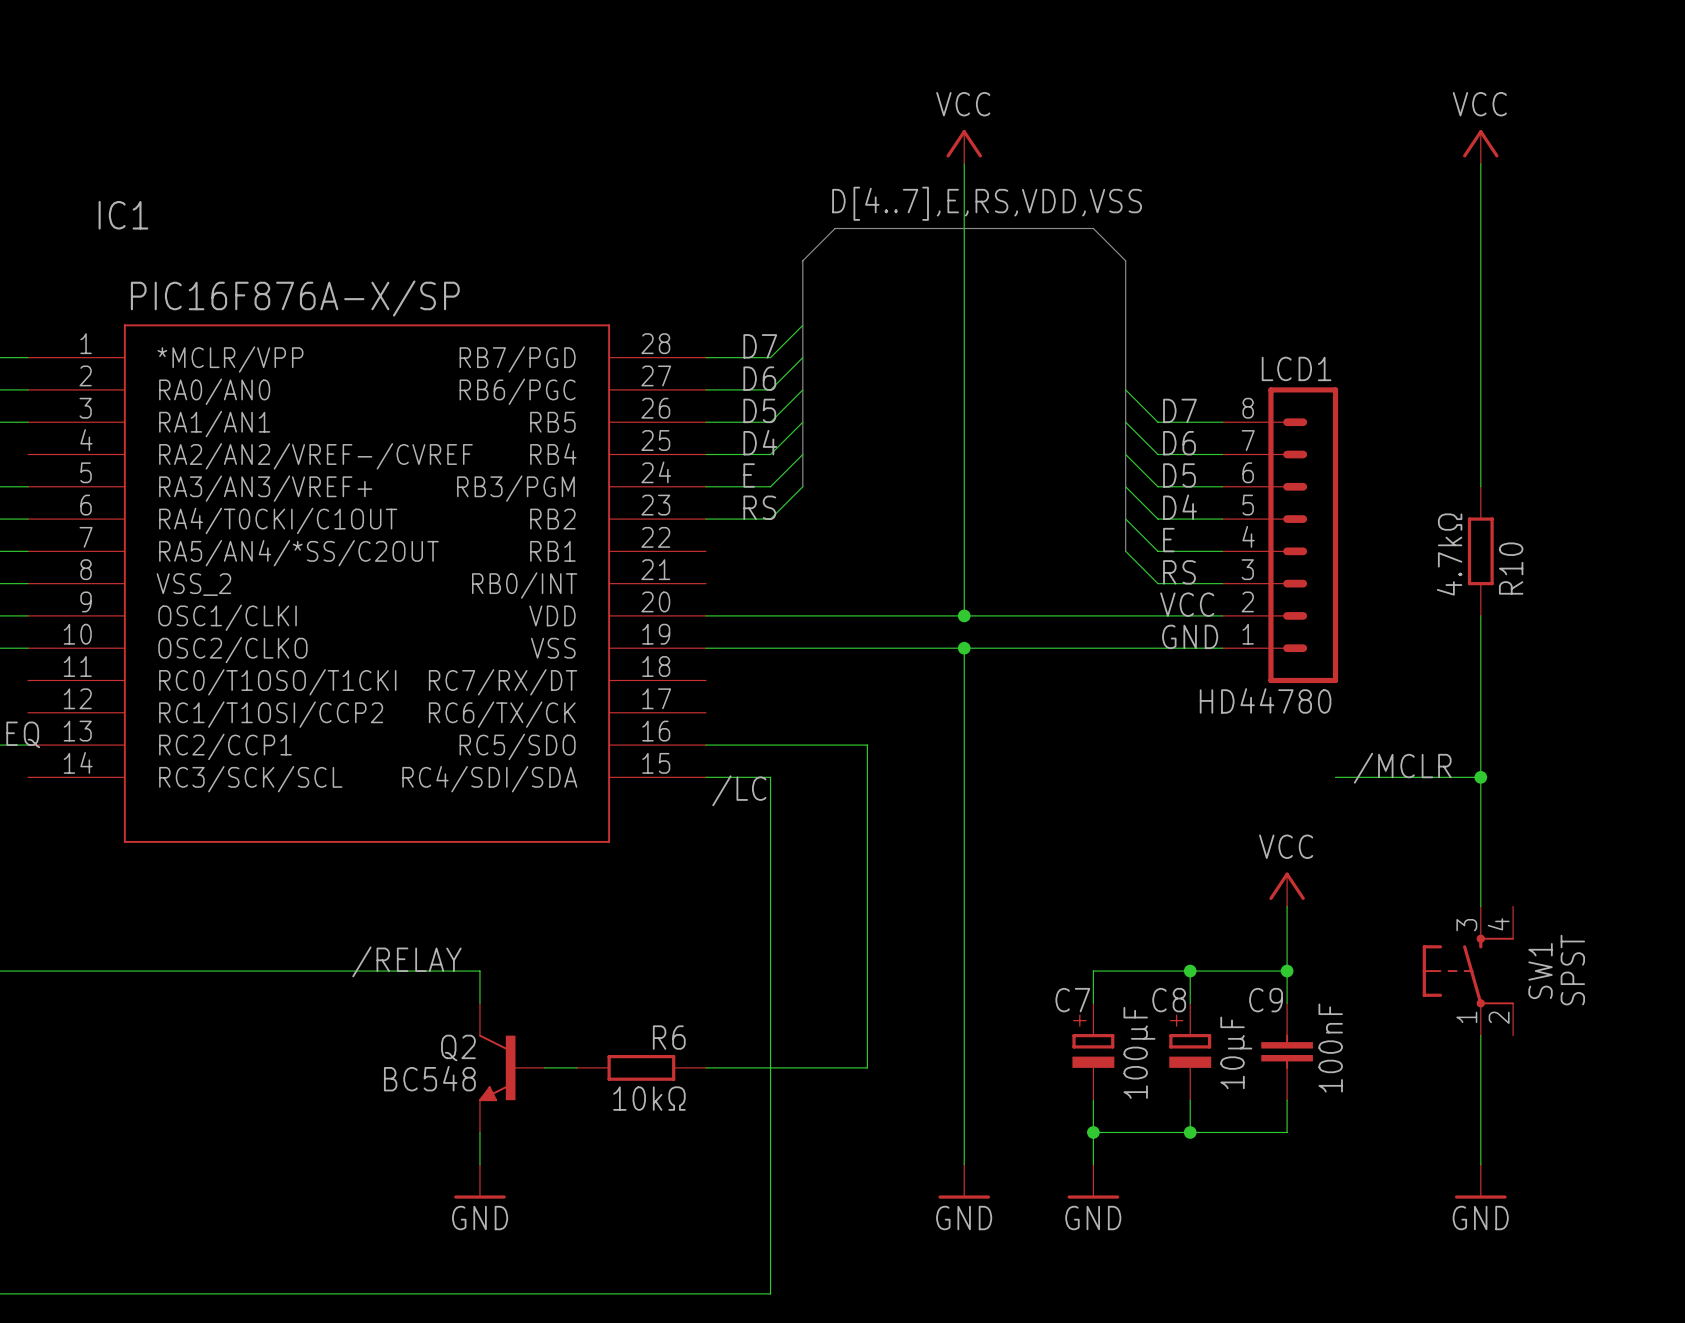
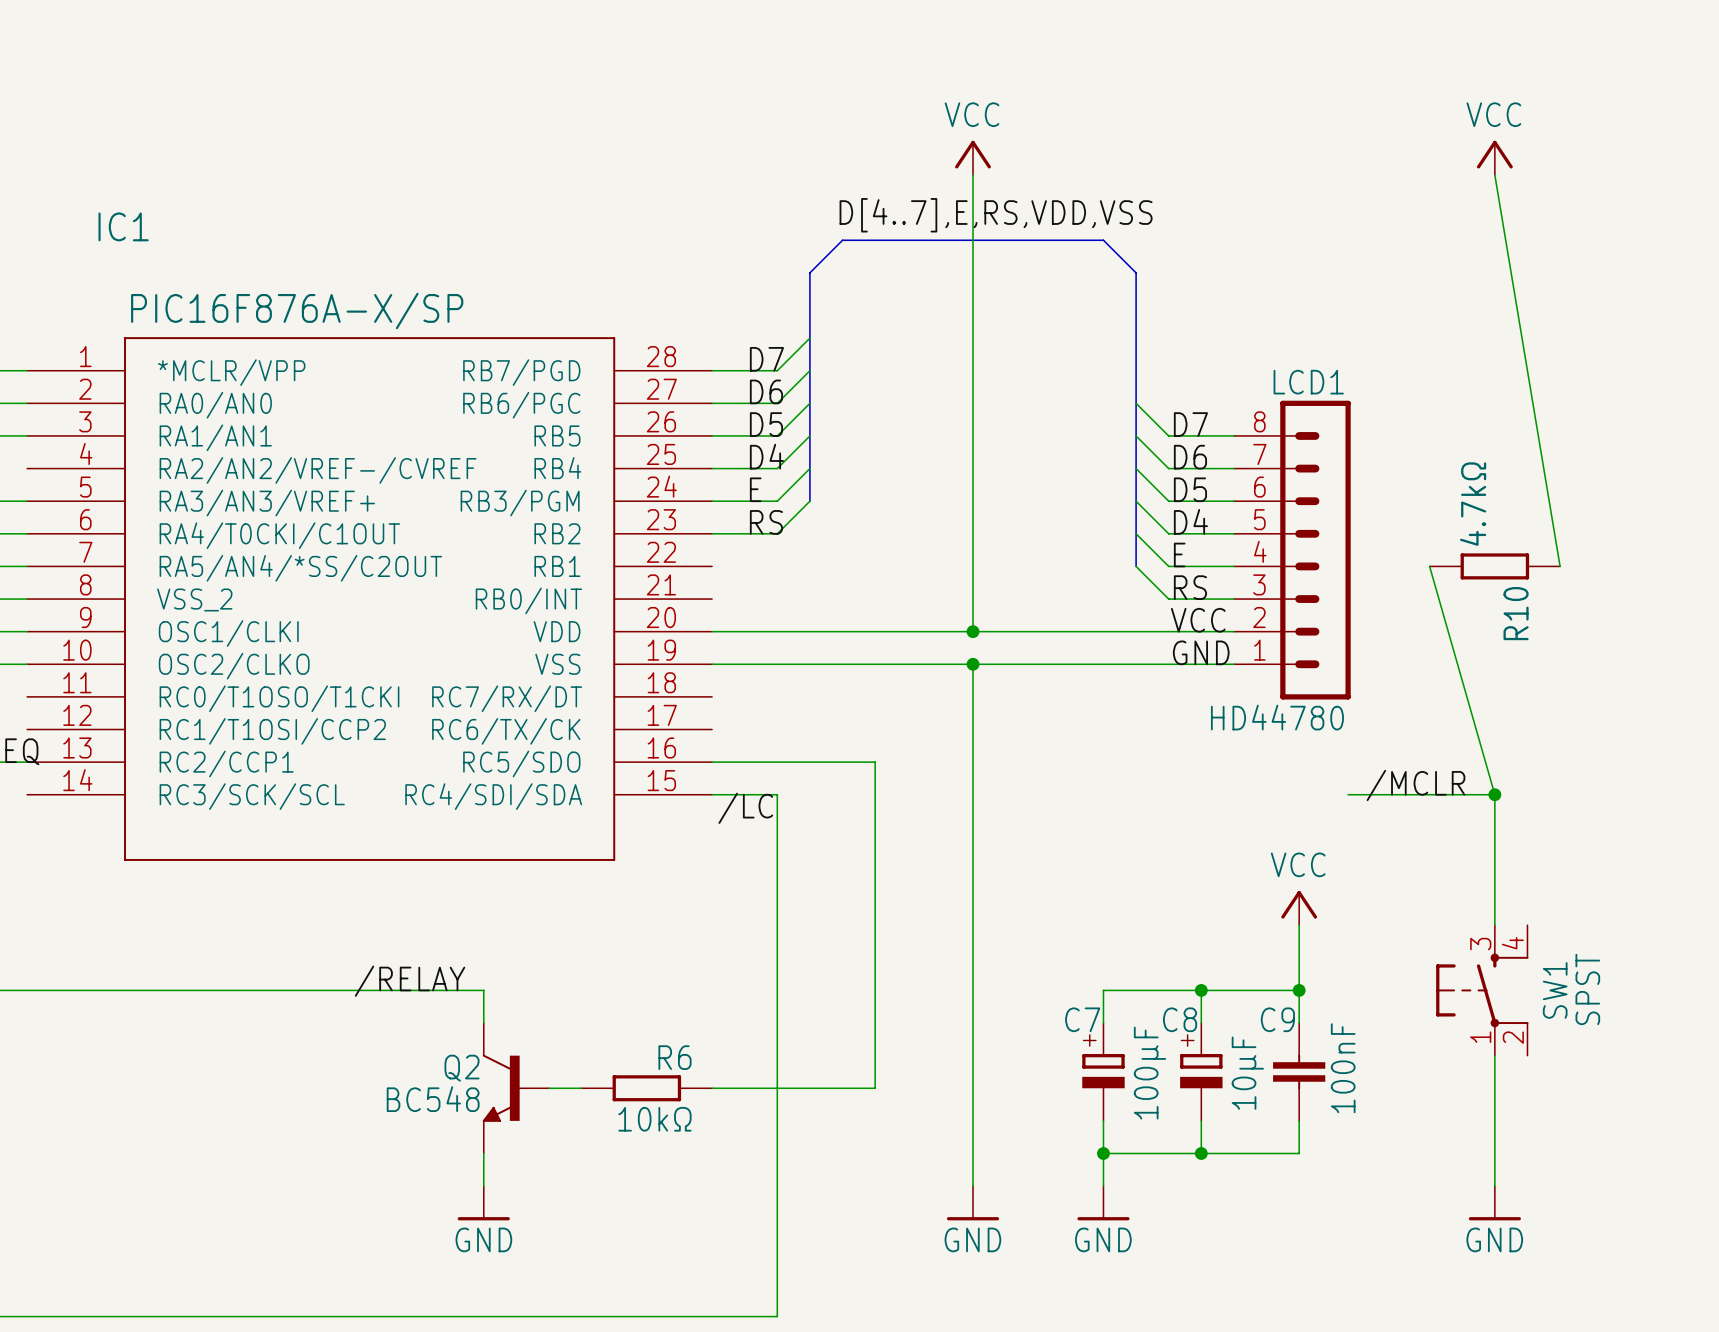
wire: (1480, 163) (1480, 486) -> (1494, 175) (1560, 566)
R10 rotation: 0° (1480, 551) -> 90° clockwise (1494, 566)
R10 value position: 4.7kΩ (1449, 554) -> 4.7kΩ (1473, 504)
R10 name position: R10 (1511, 568) -> R10 (1516, 613)
wire: (1480, 615) (1480, 777) -> (1429, 566) (1494, 794)

